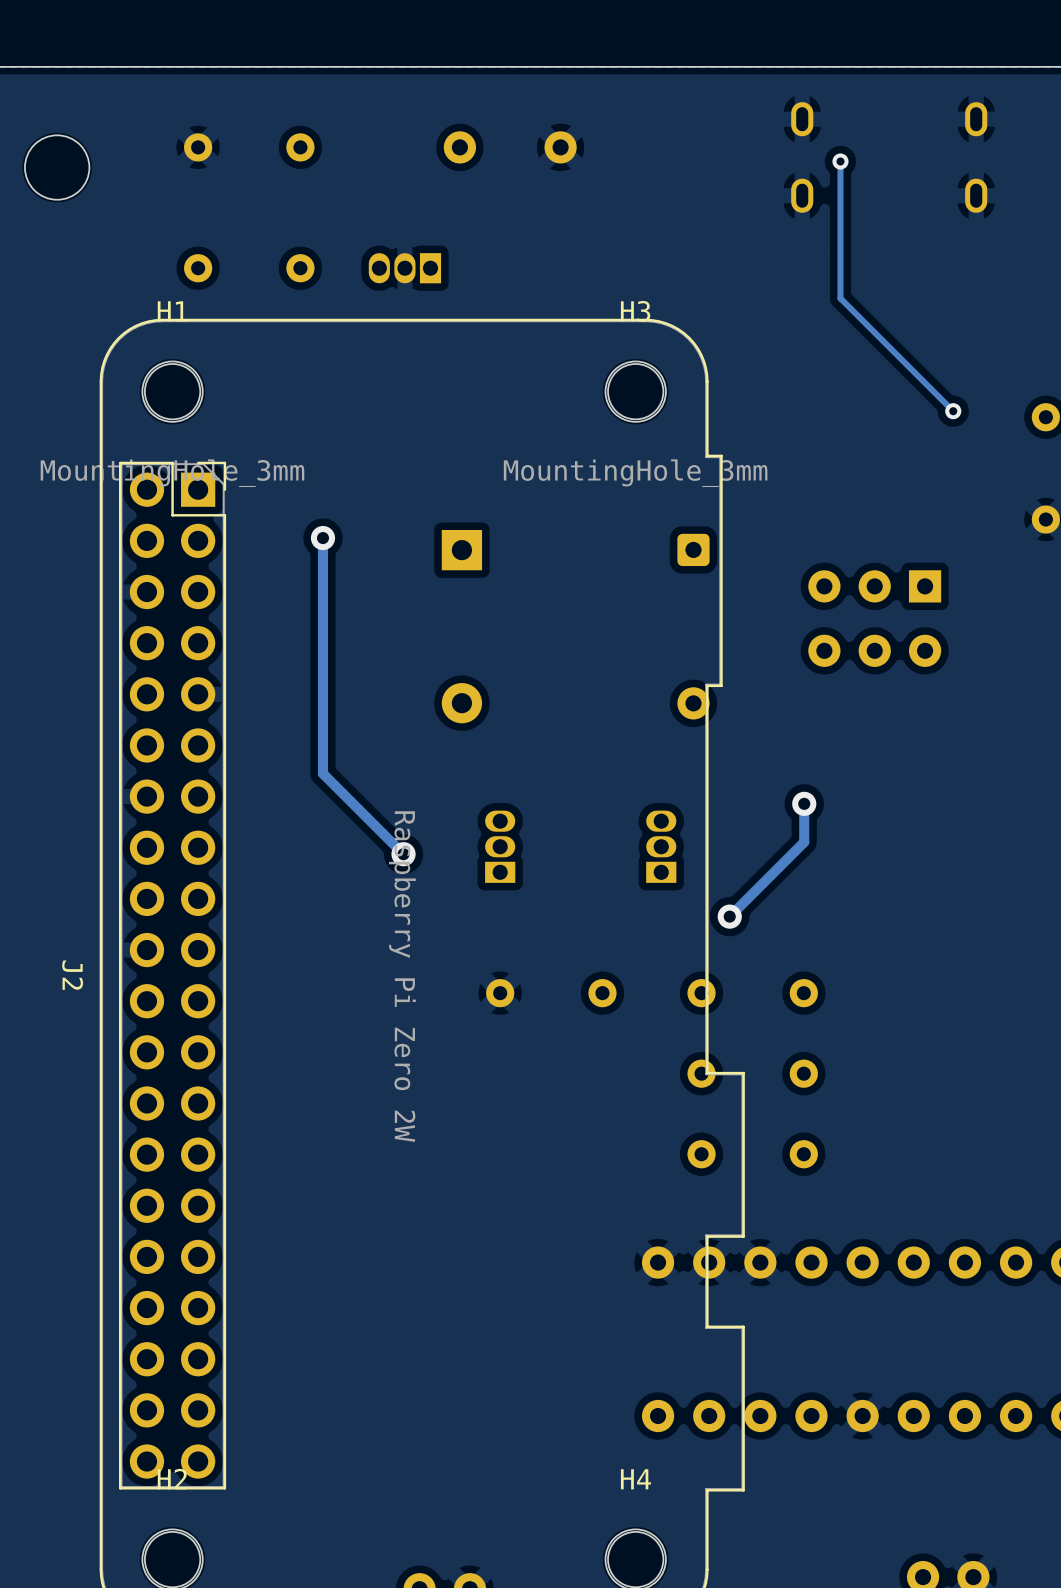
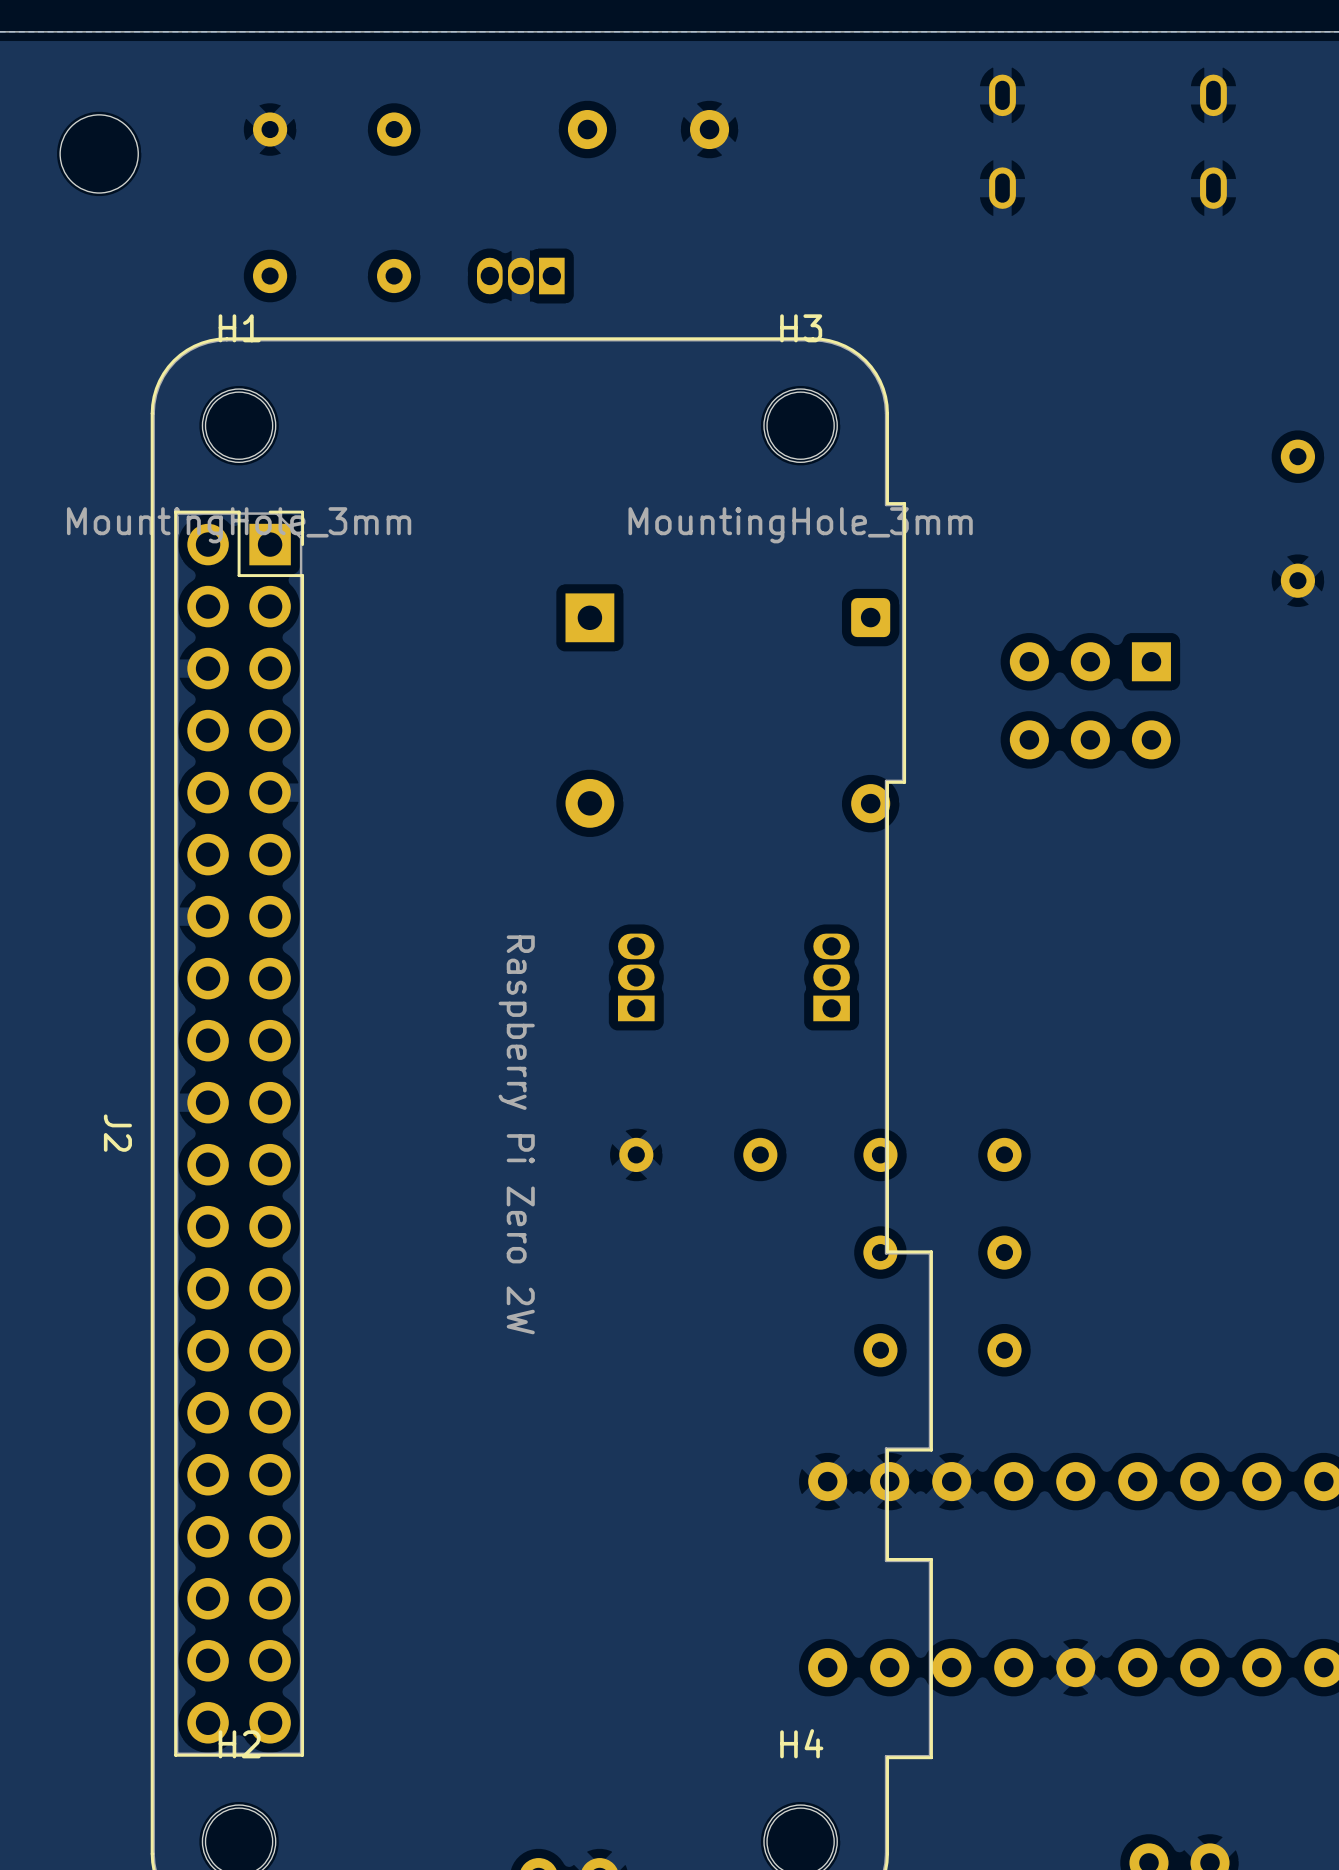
track: (840, 161) (840, 298) (953, 411) -> none
via: (840, 161) -> none
via: (953, 411) -> none
track: (322, 538) (322, 773) (403, 854) -> none
via: (322, 538) -> none
track: (804, 803) (804, 842) (729, 916) -> none
via: (804, 803) -> none
via: (403, 854) -> none
via: (729, 916) -> none

